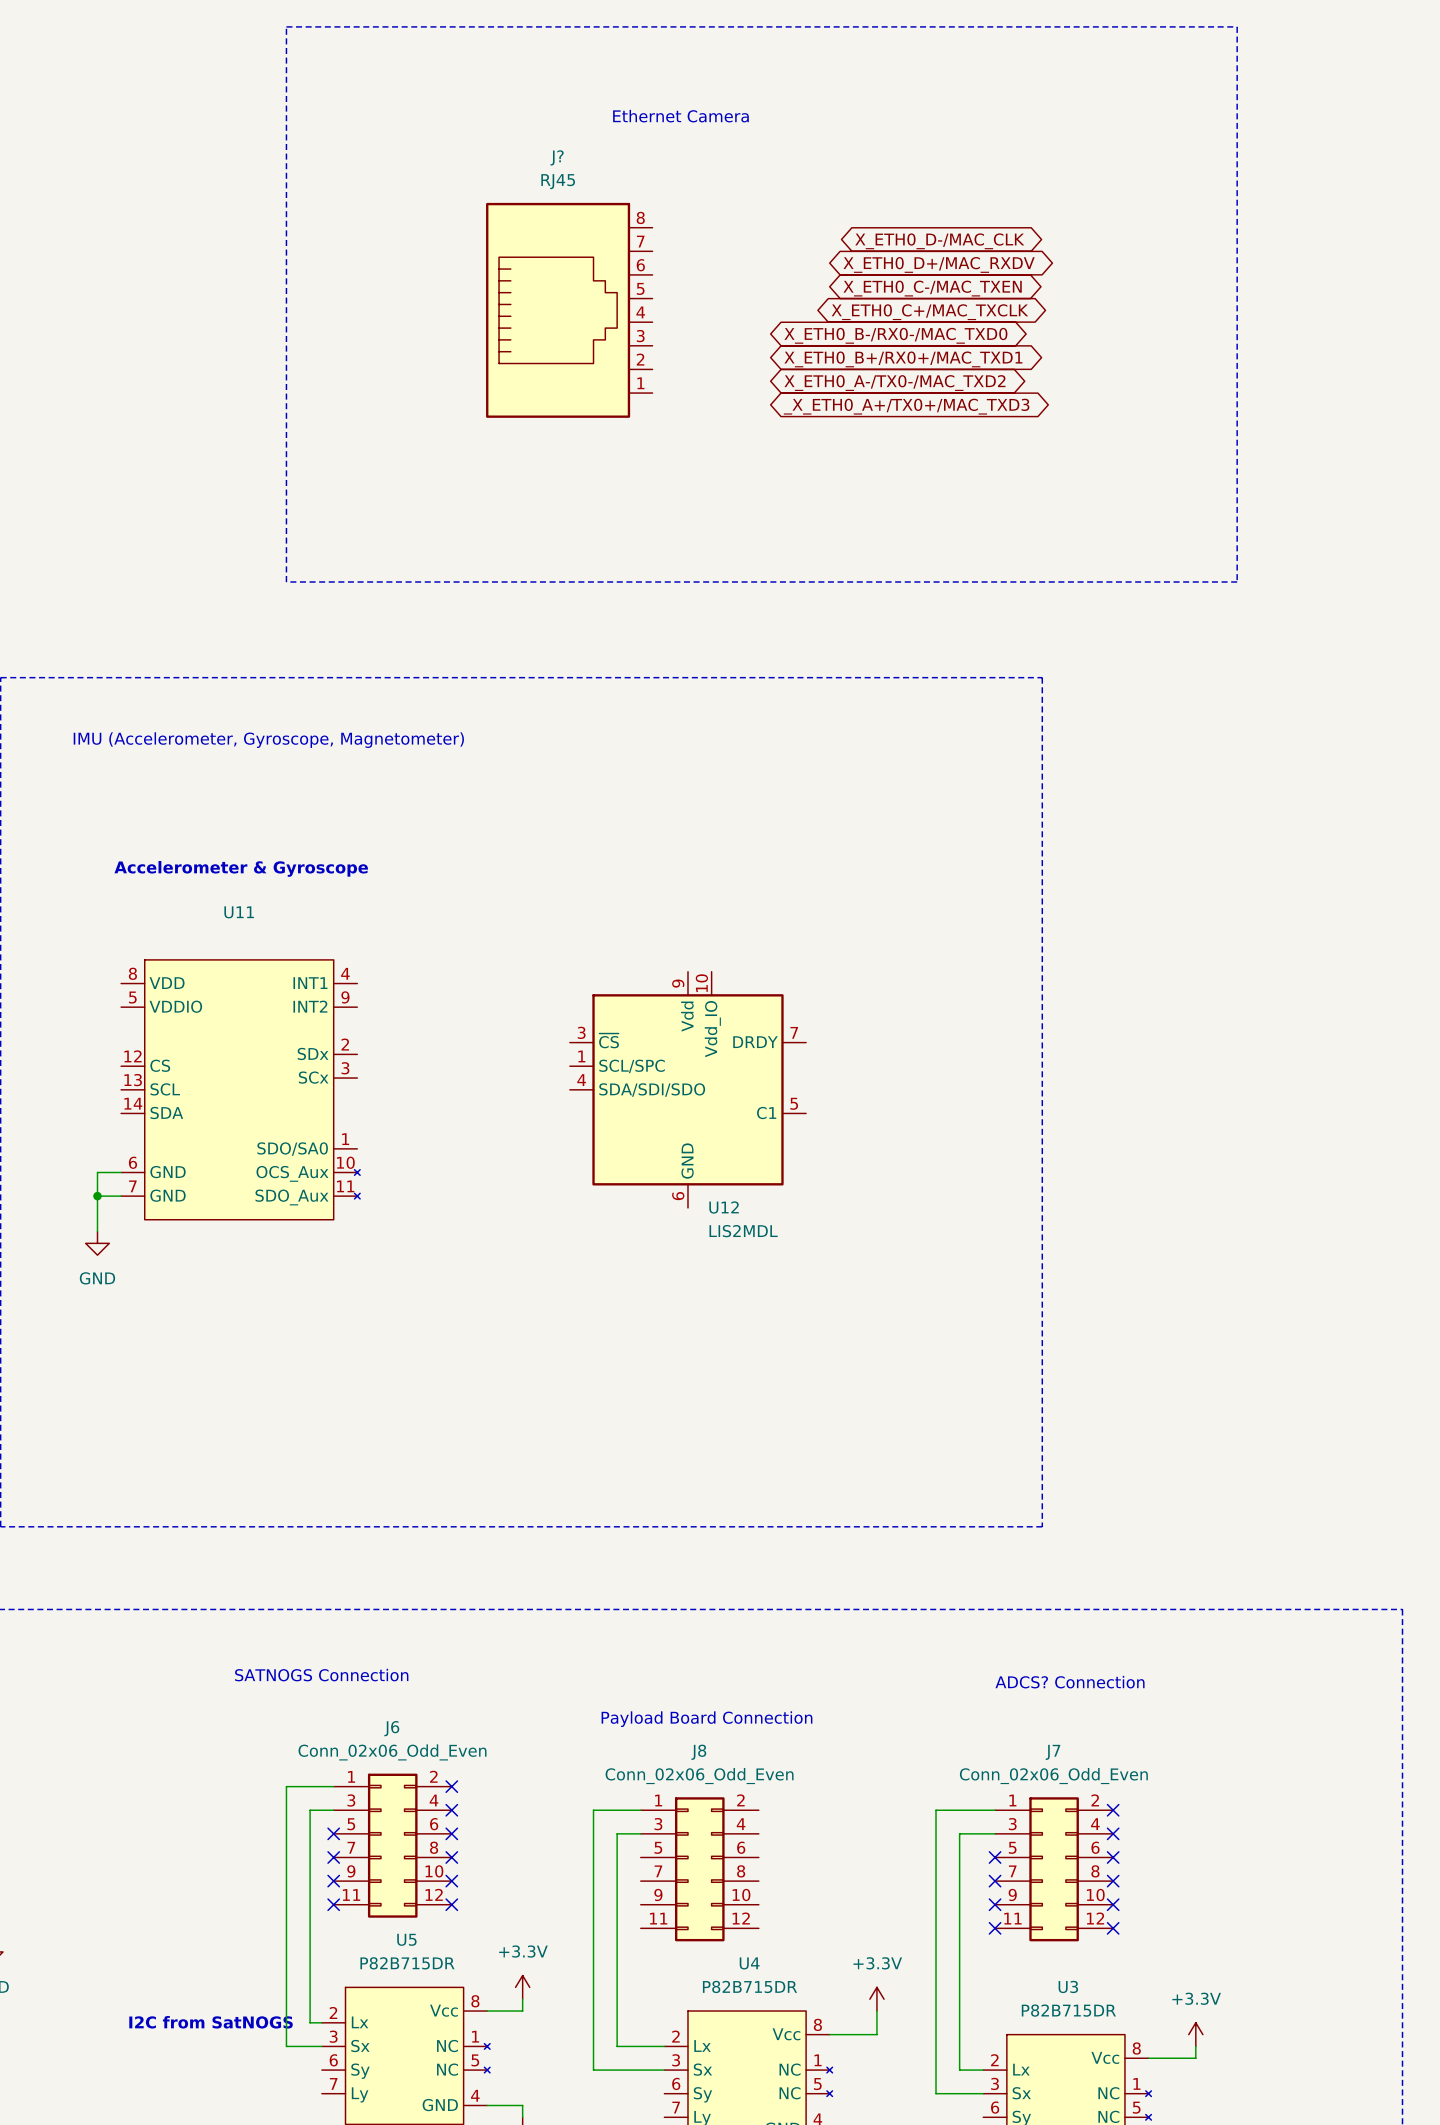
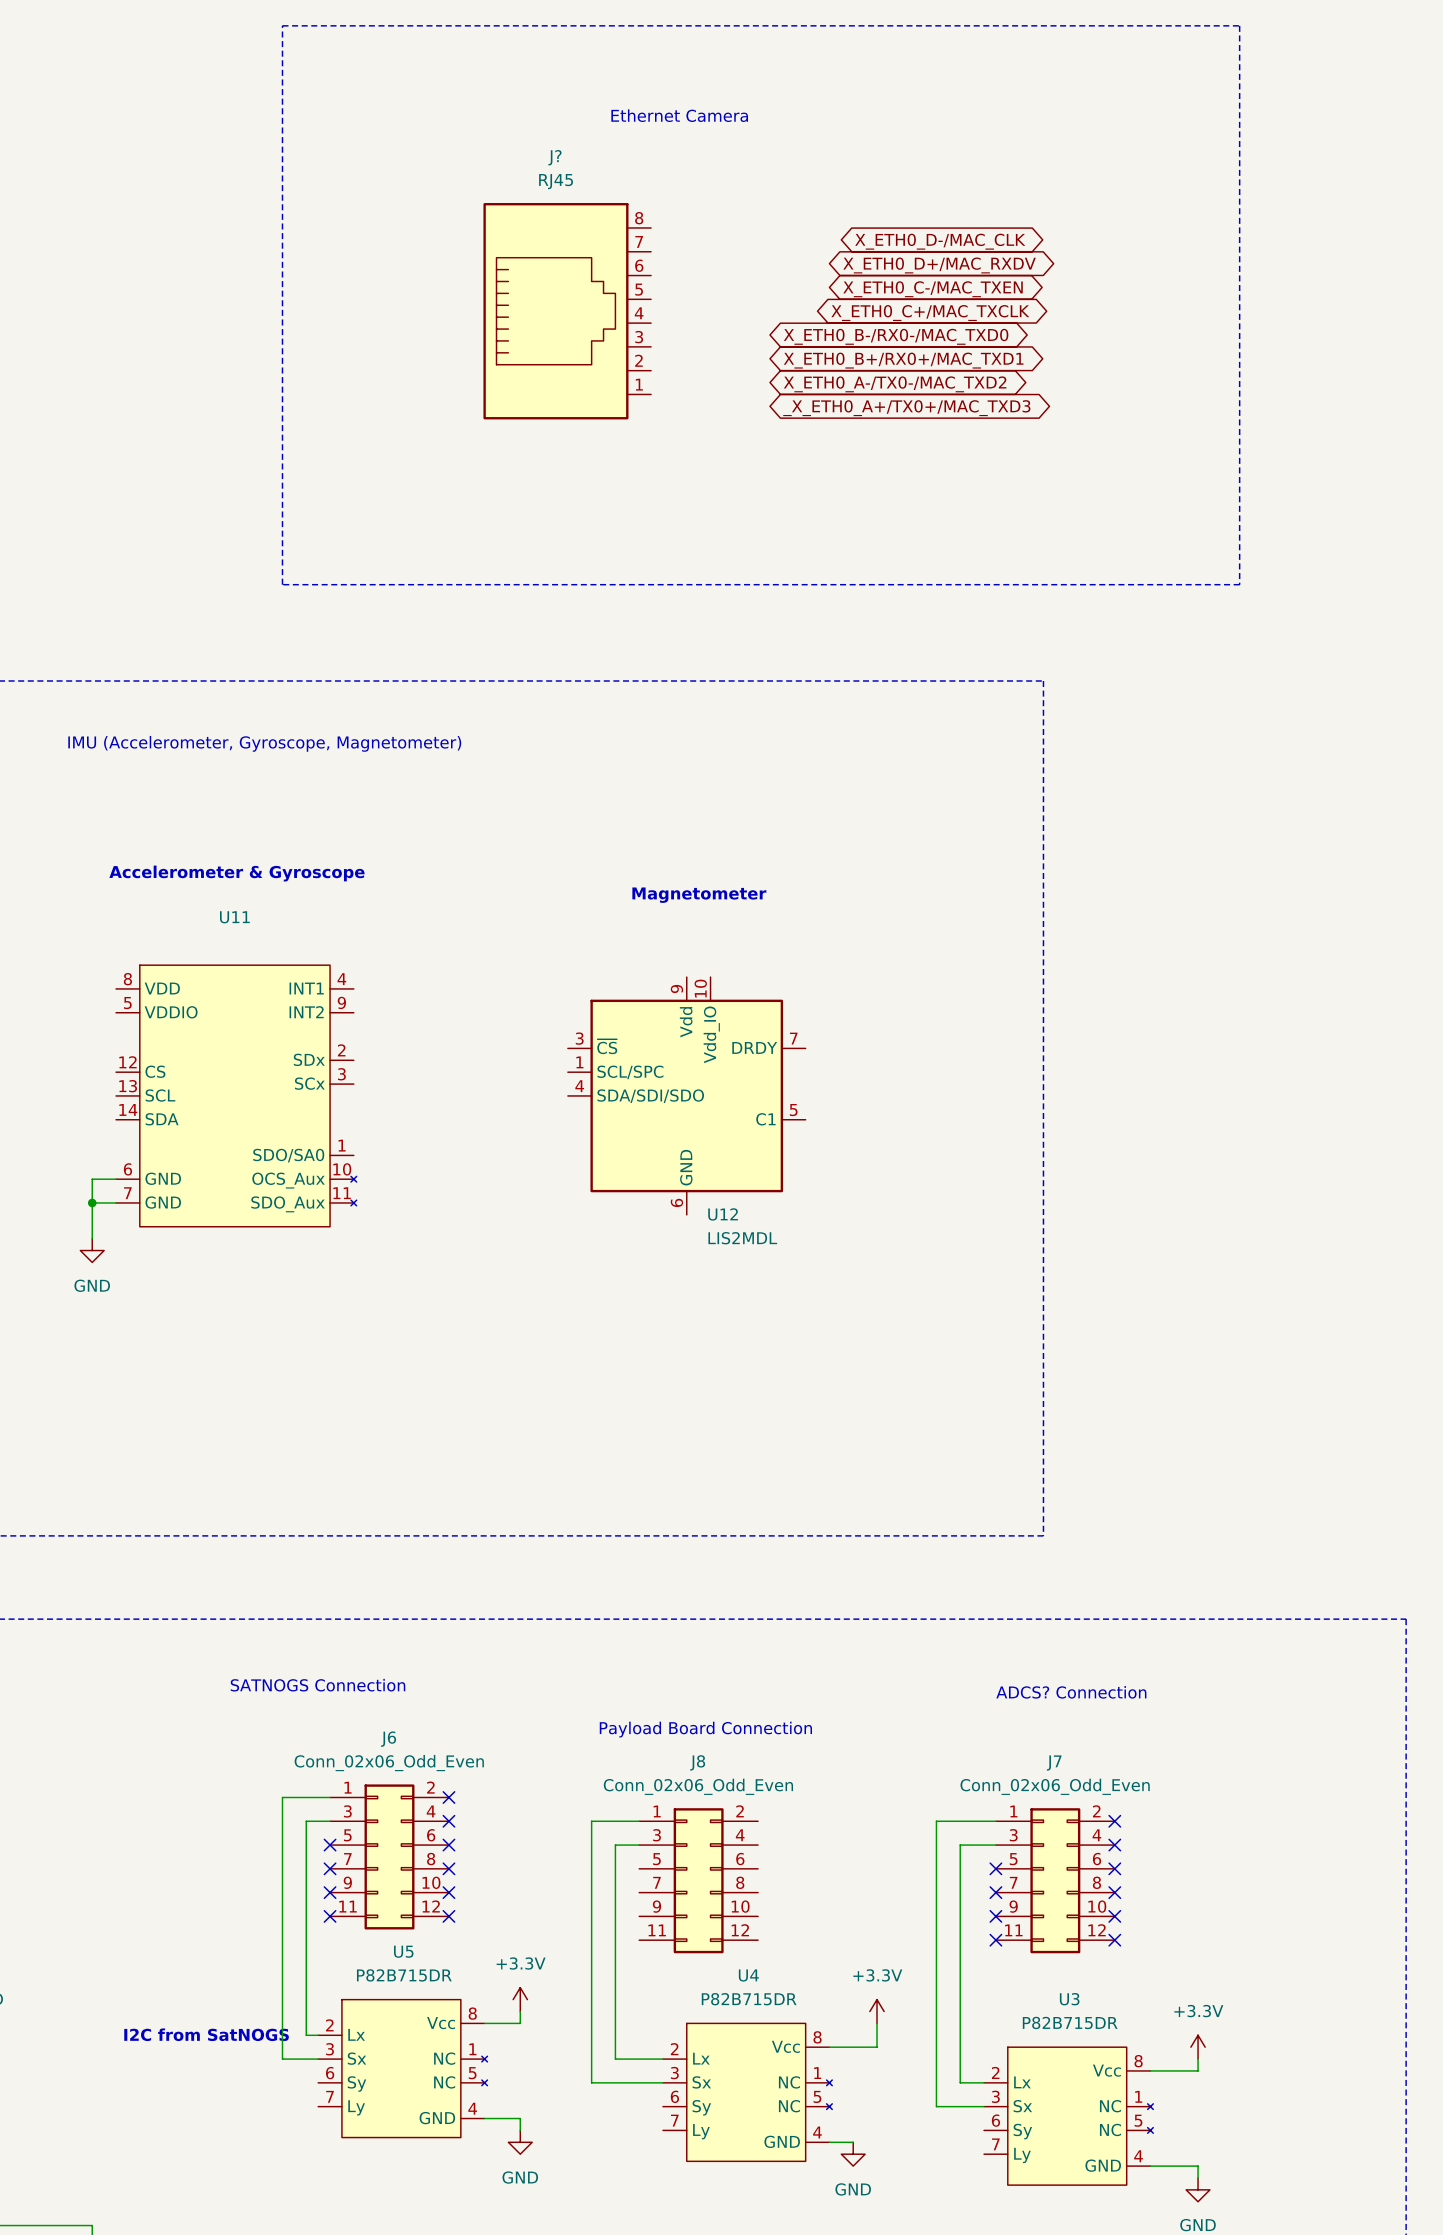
text: none -> Magnetometer (699, 895)

